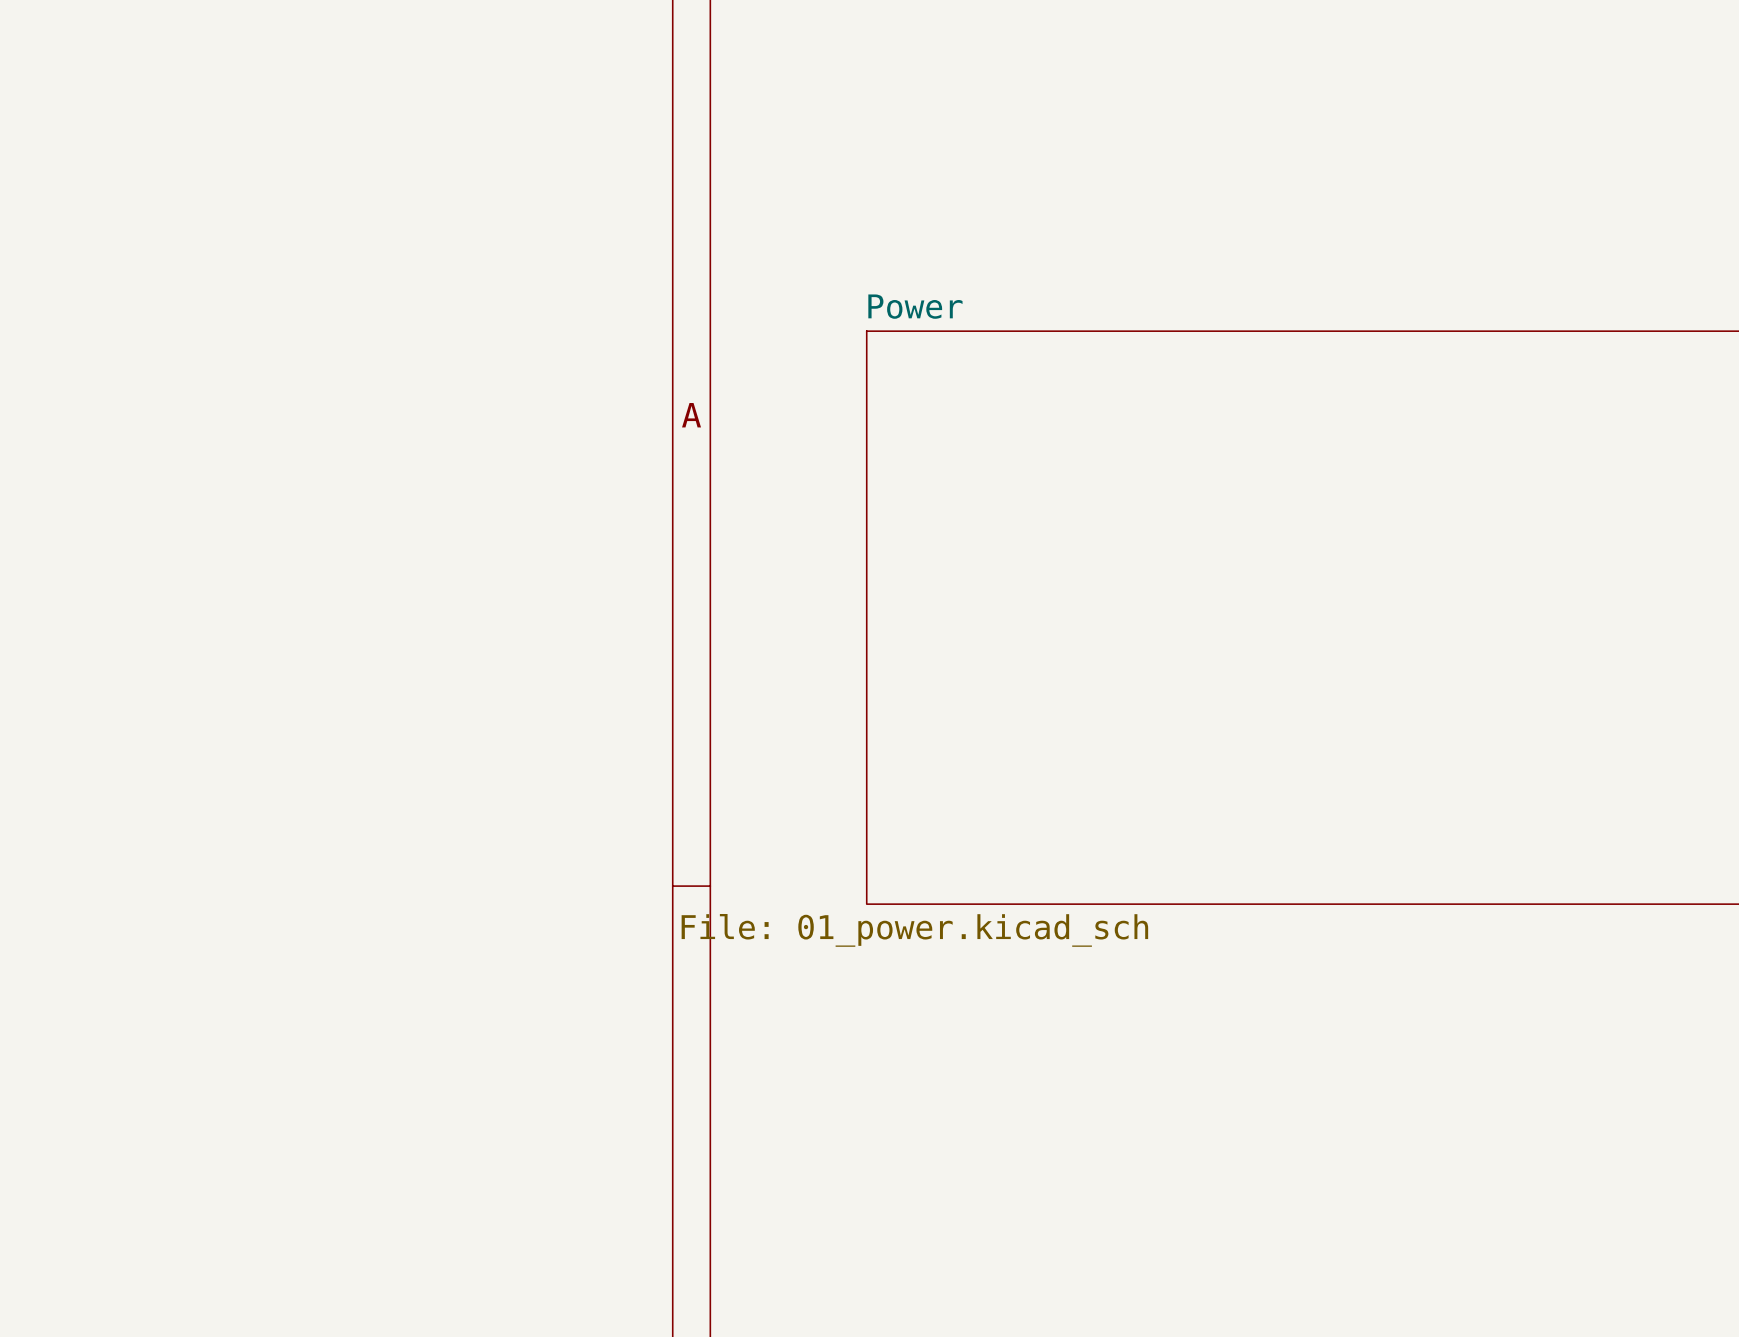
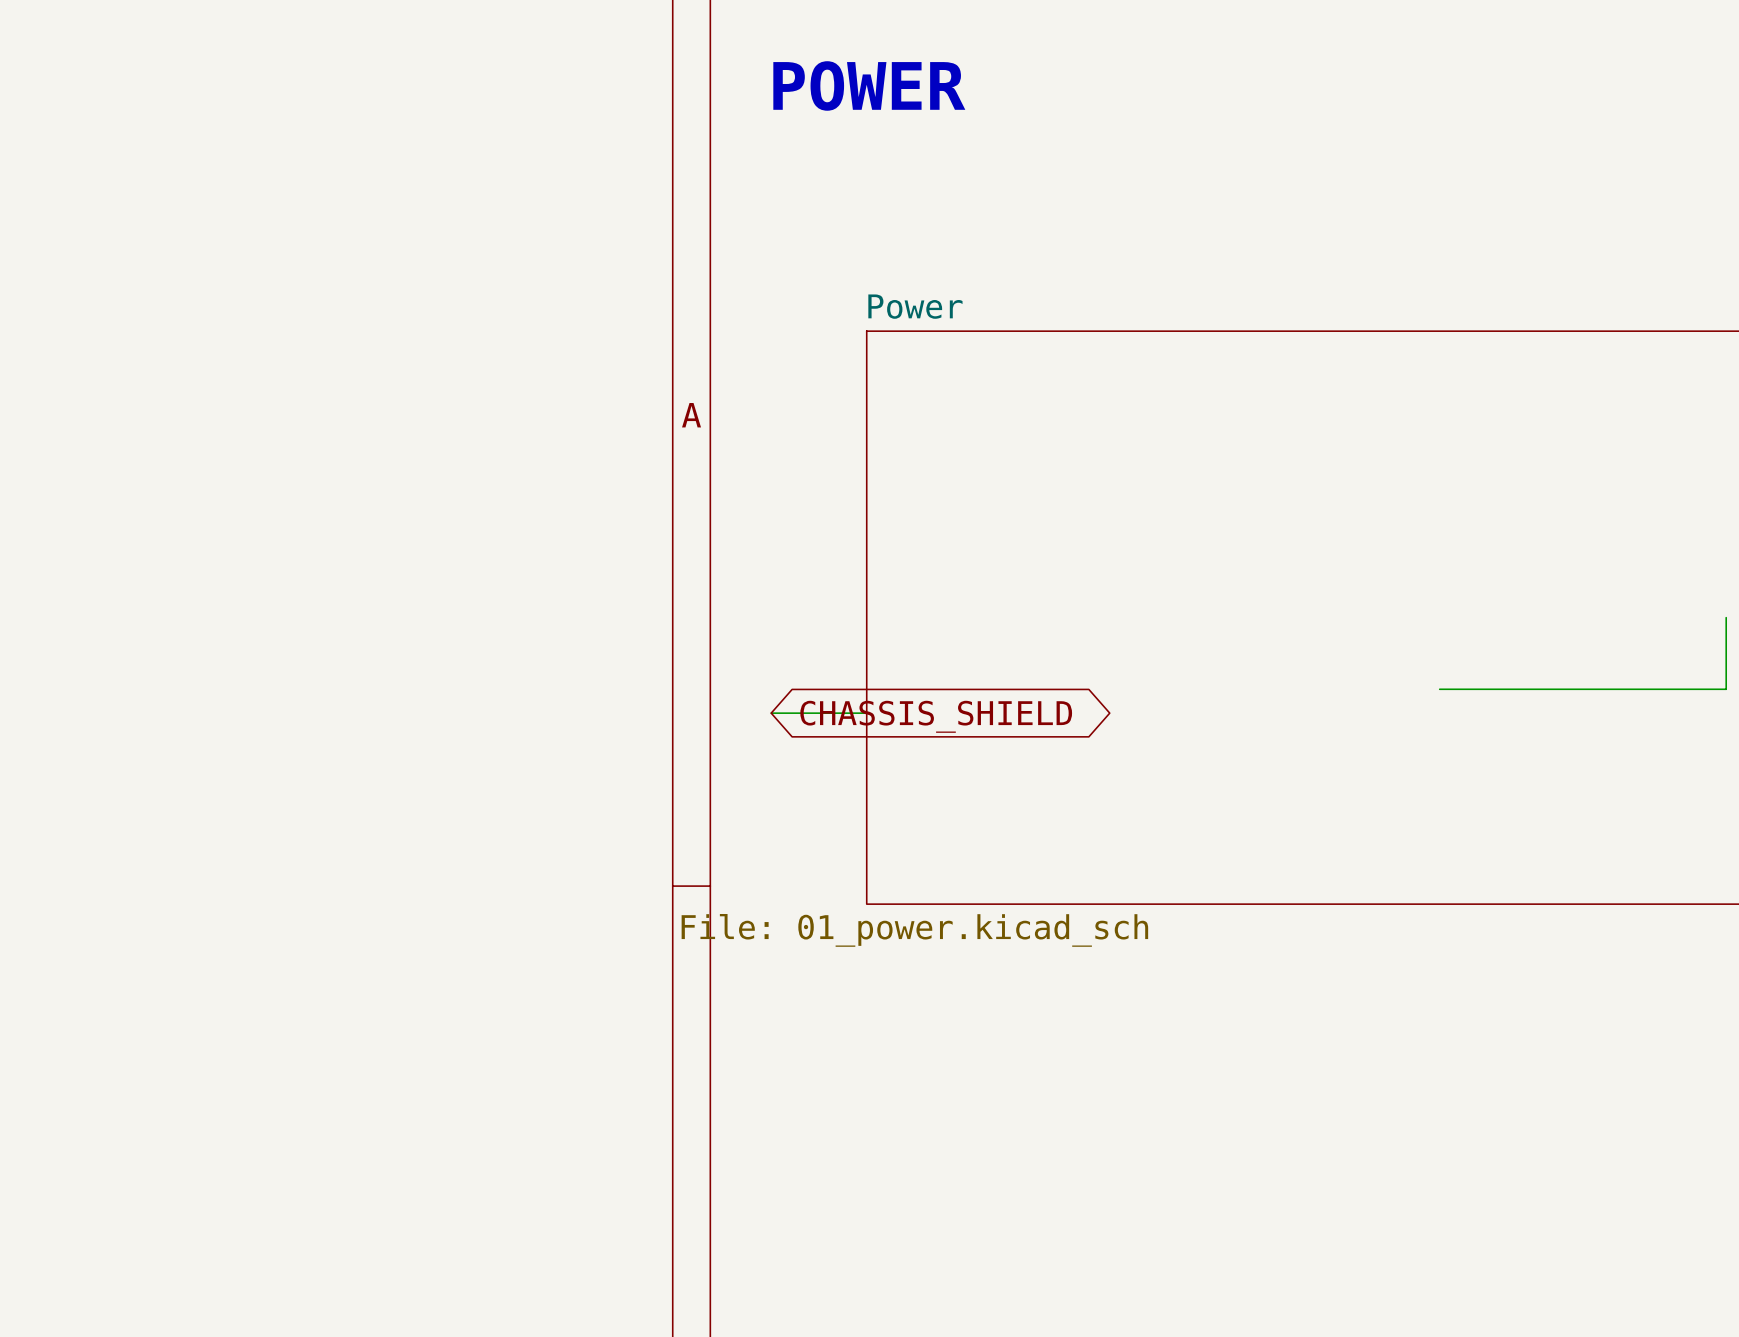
text: none -> POWER (869, 85)
wire: none -> (1726, 617) (1726, 689) (1439, 689)
wire: none -> (771, 713) (866, 713)
global label: none -> CHASSIS_SHIELD (936, 716)

